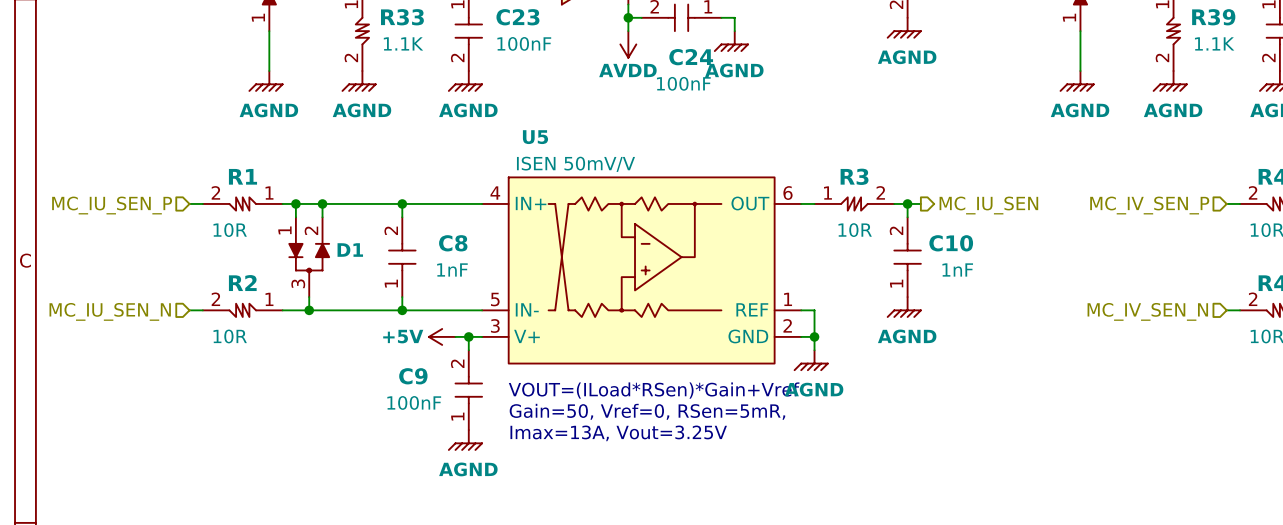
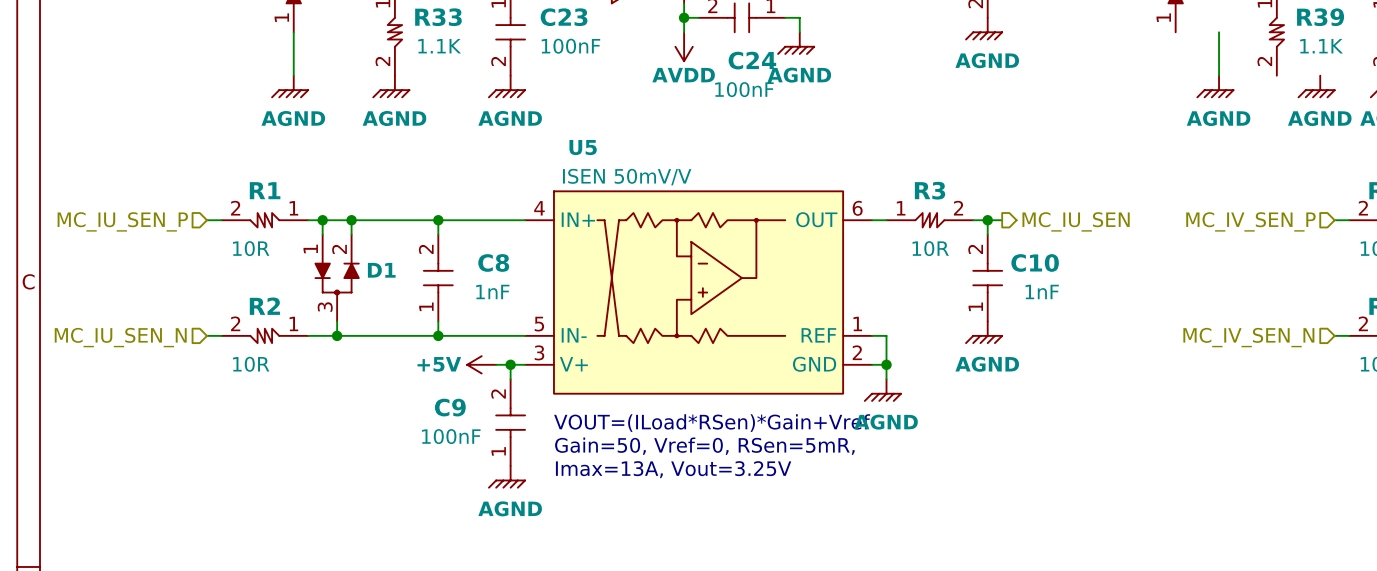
wire: (1080, 31) (1080, 71) -> (1219, 32) (1219, 75)
power symbol: AGND (1077, 80) -> none
power symbol: none -> AGND (1215, 86)
power symbol: AGND (1170, 80) -> none
power symbol: none -> AGND (1316, 86)

